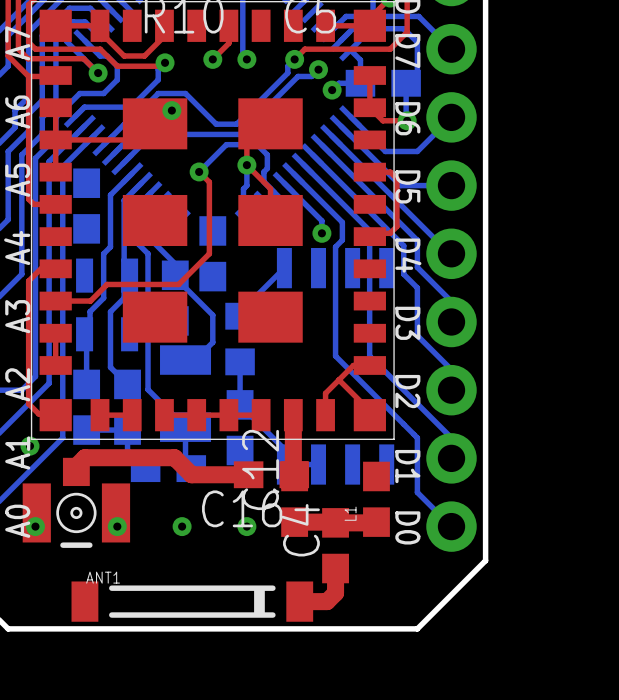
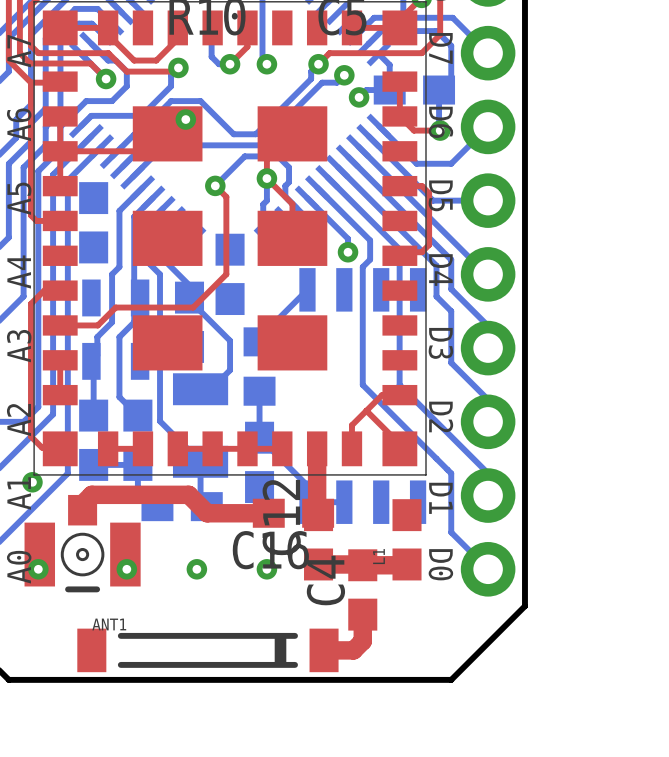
bottom track: none -> (211, 44) (211, 56) (218, 64) (230, 64)

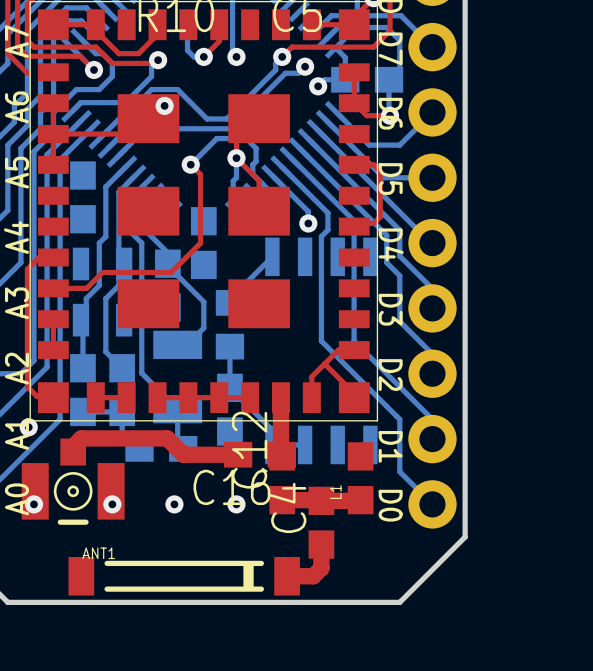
top track: (60, 81) (30, 82) (30, 215) (36, 220) (60, 220) -> none

